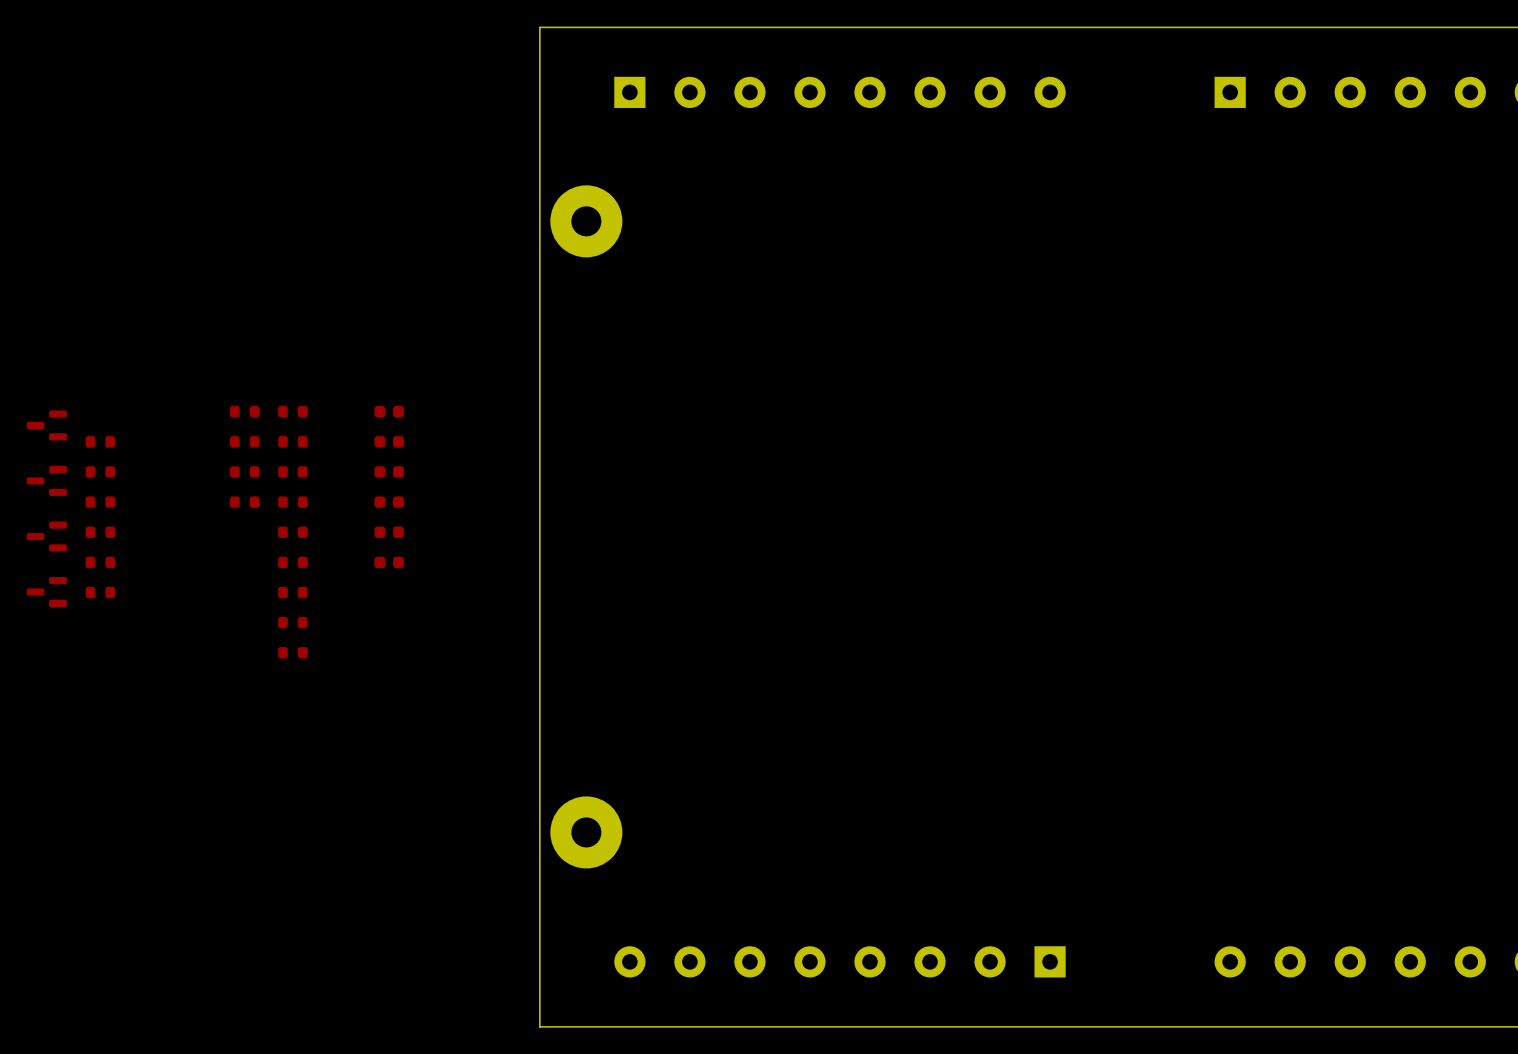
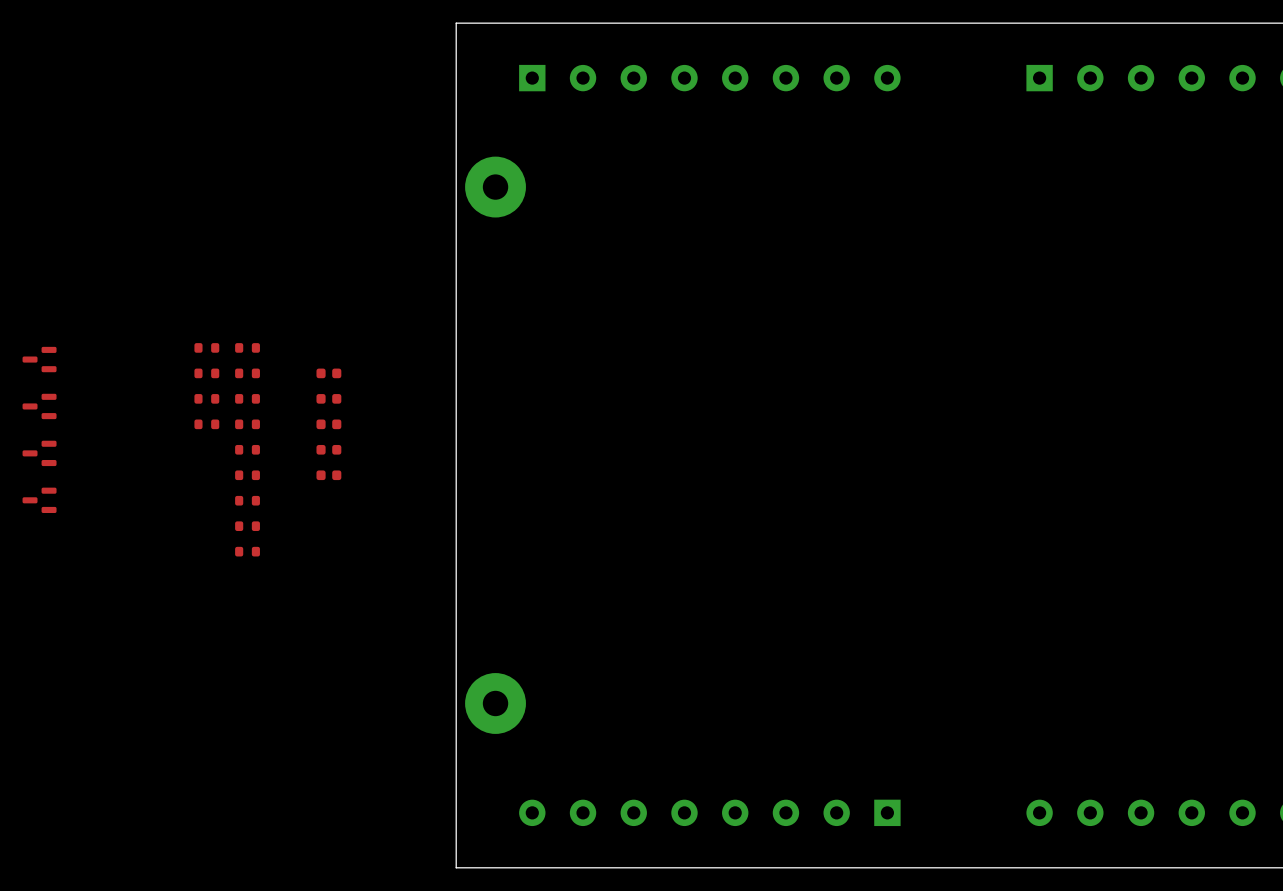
part: (389, 411) -> none
part: (100, 441) -> none
part: (100, 471) -> none
part: (100, 502) -> none
part: (100, 532) -> none
part: (100, 562) -> none
part: (100, 592) -> none

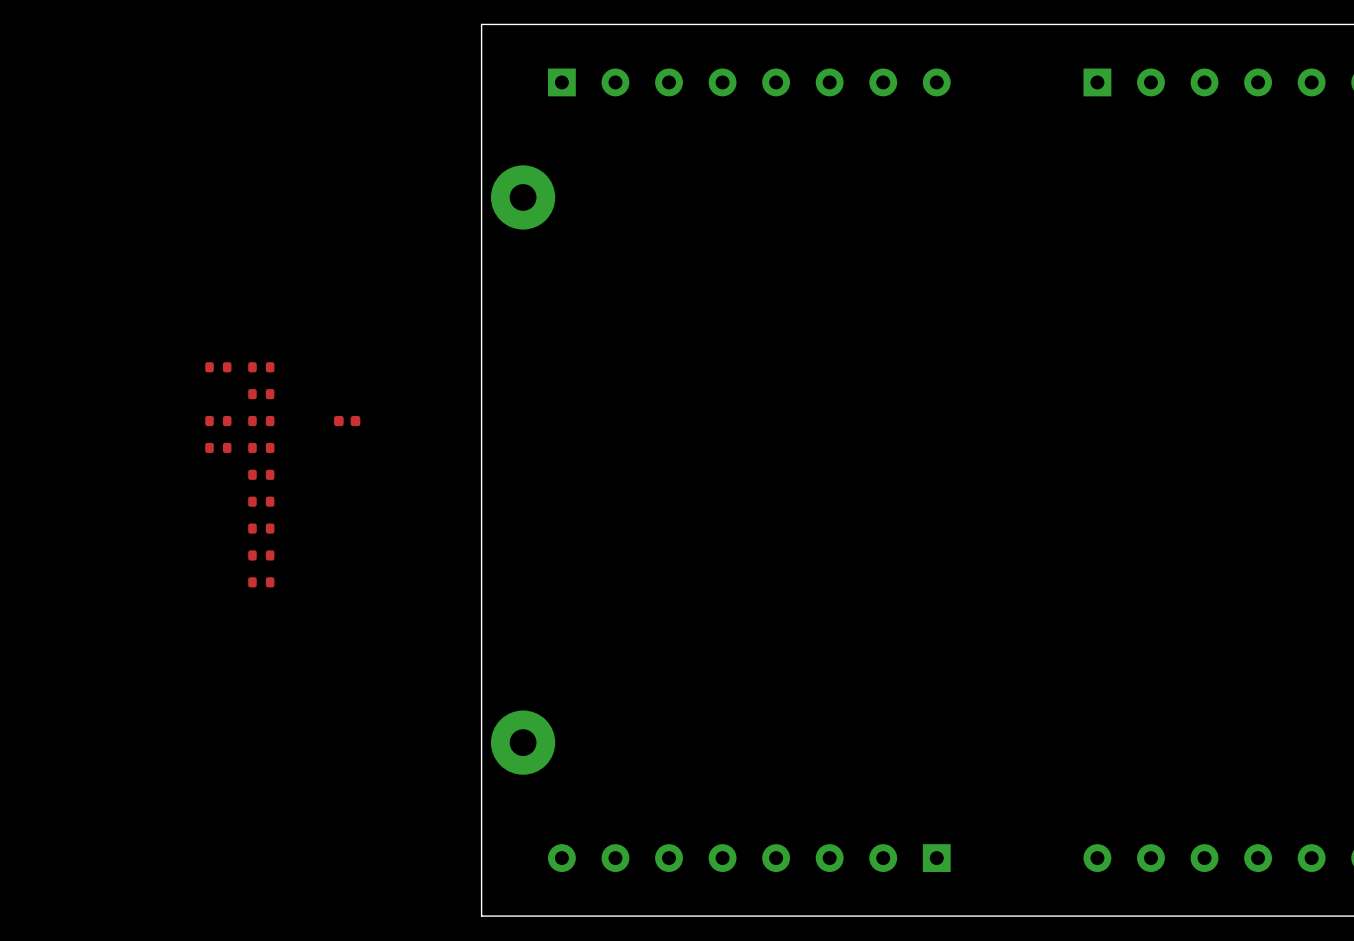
part: (39, 359) -> none
part: (206, 373) -> none
part: (328, 373) -> none
part: (39, 406) -> none
part: (328, 424) -> none
part: (328, 449) -> none
part: (39, 453) -> none
part: (328, 475) -> none
part: (39, 500) -> none

